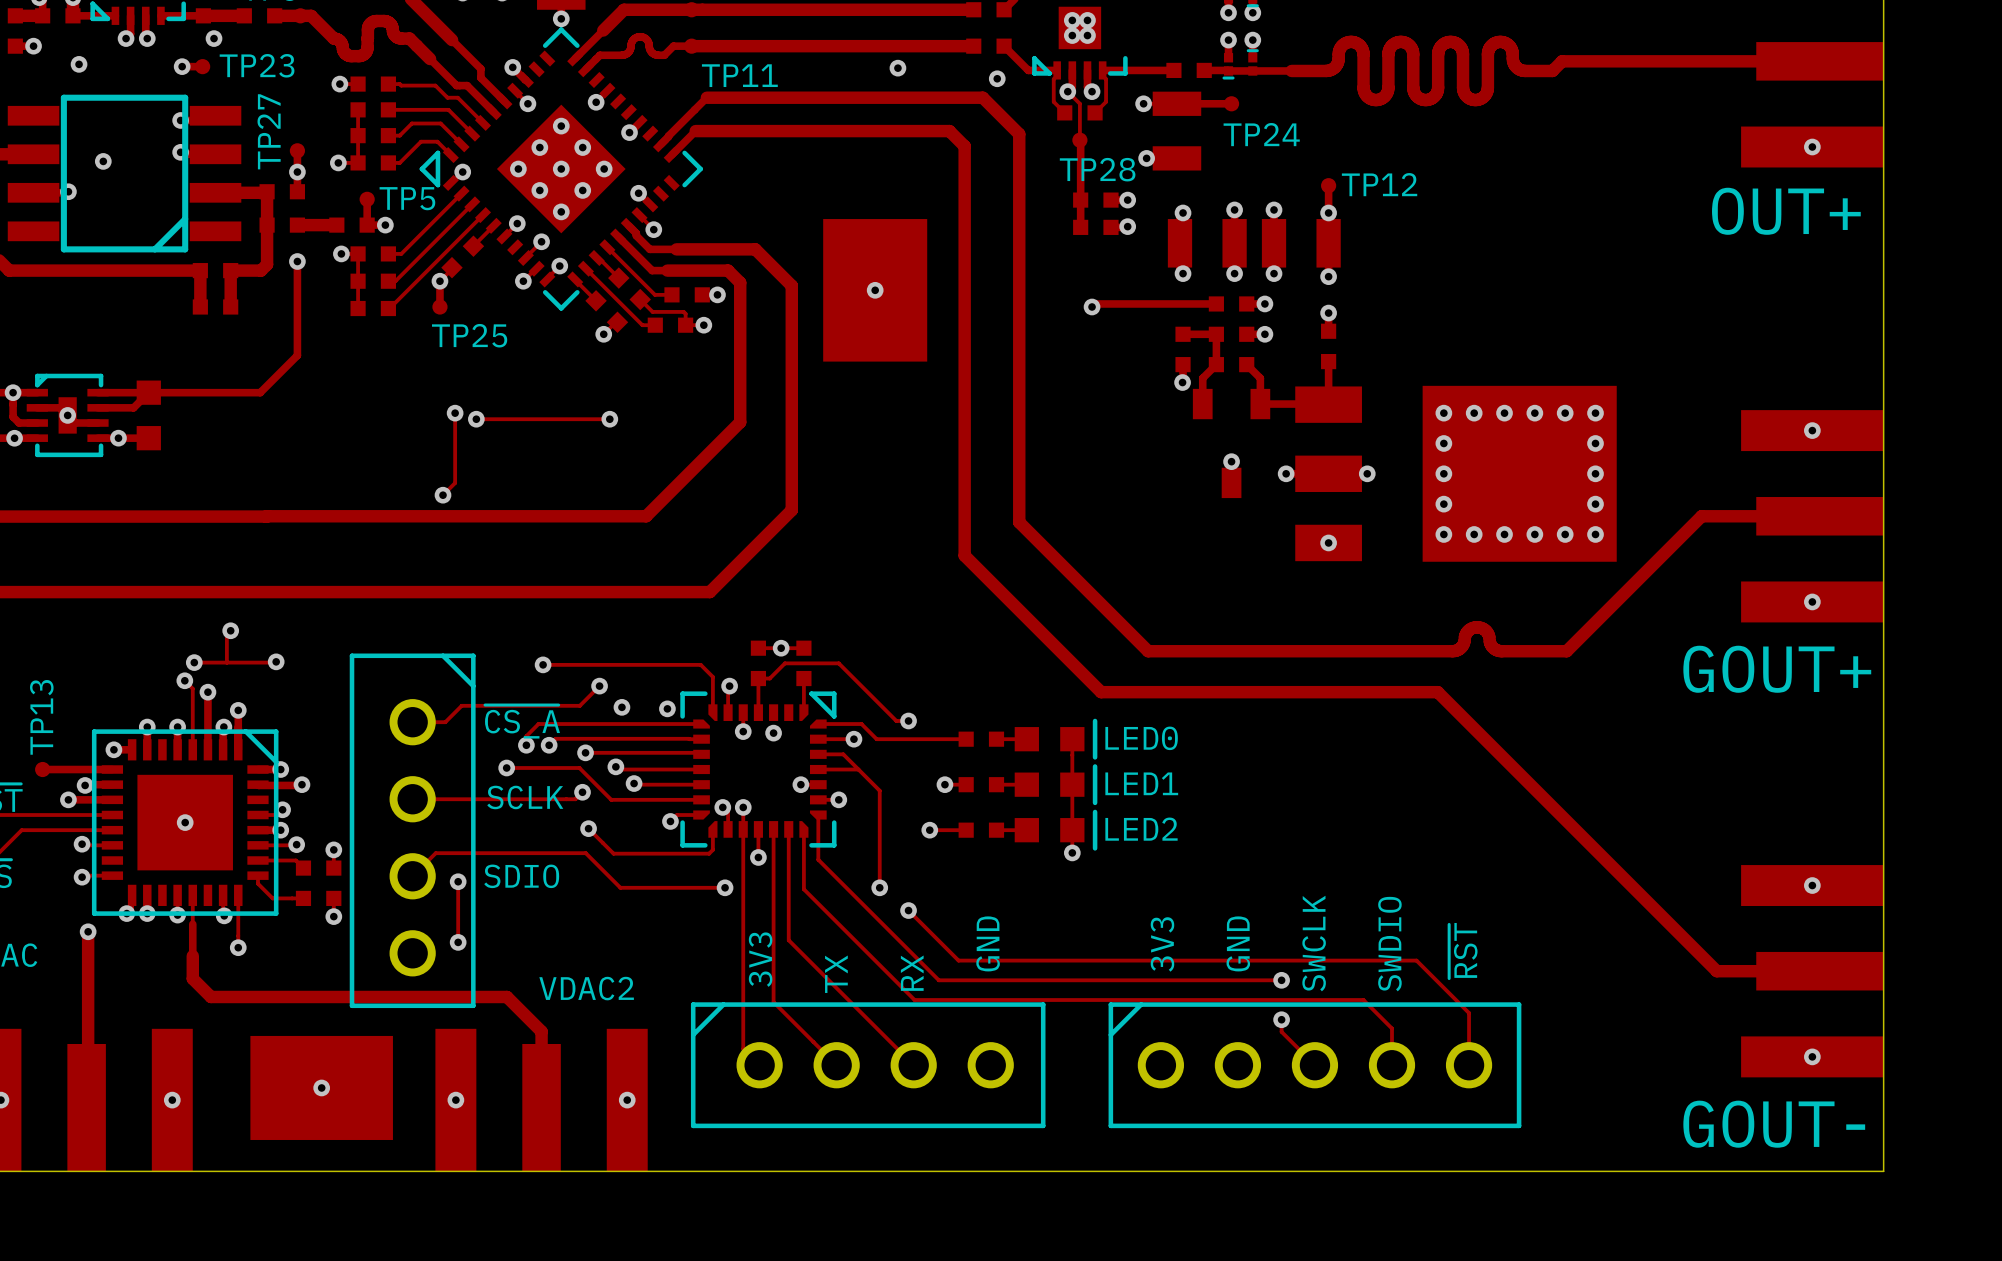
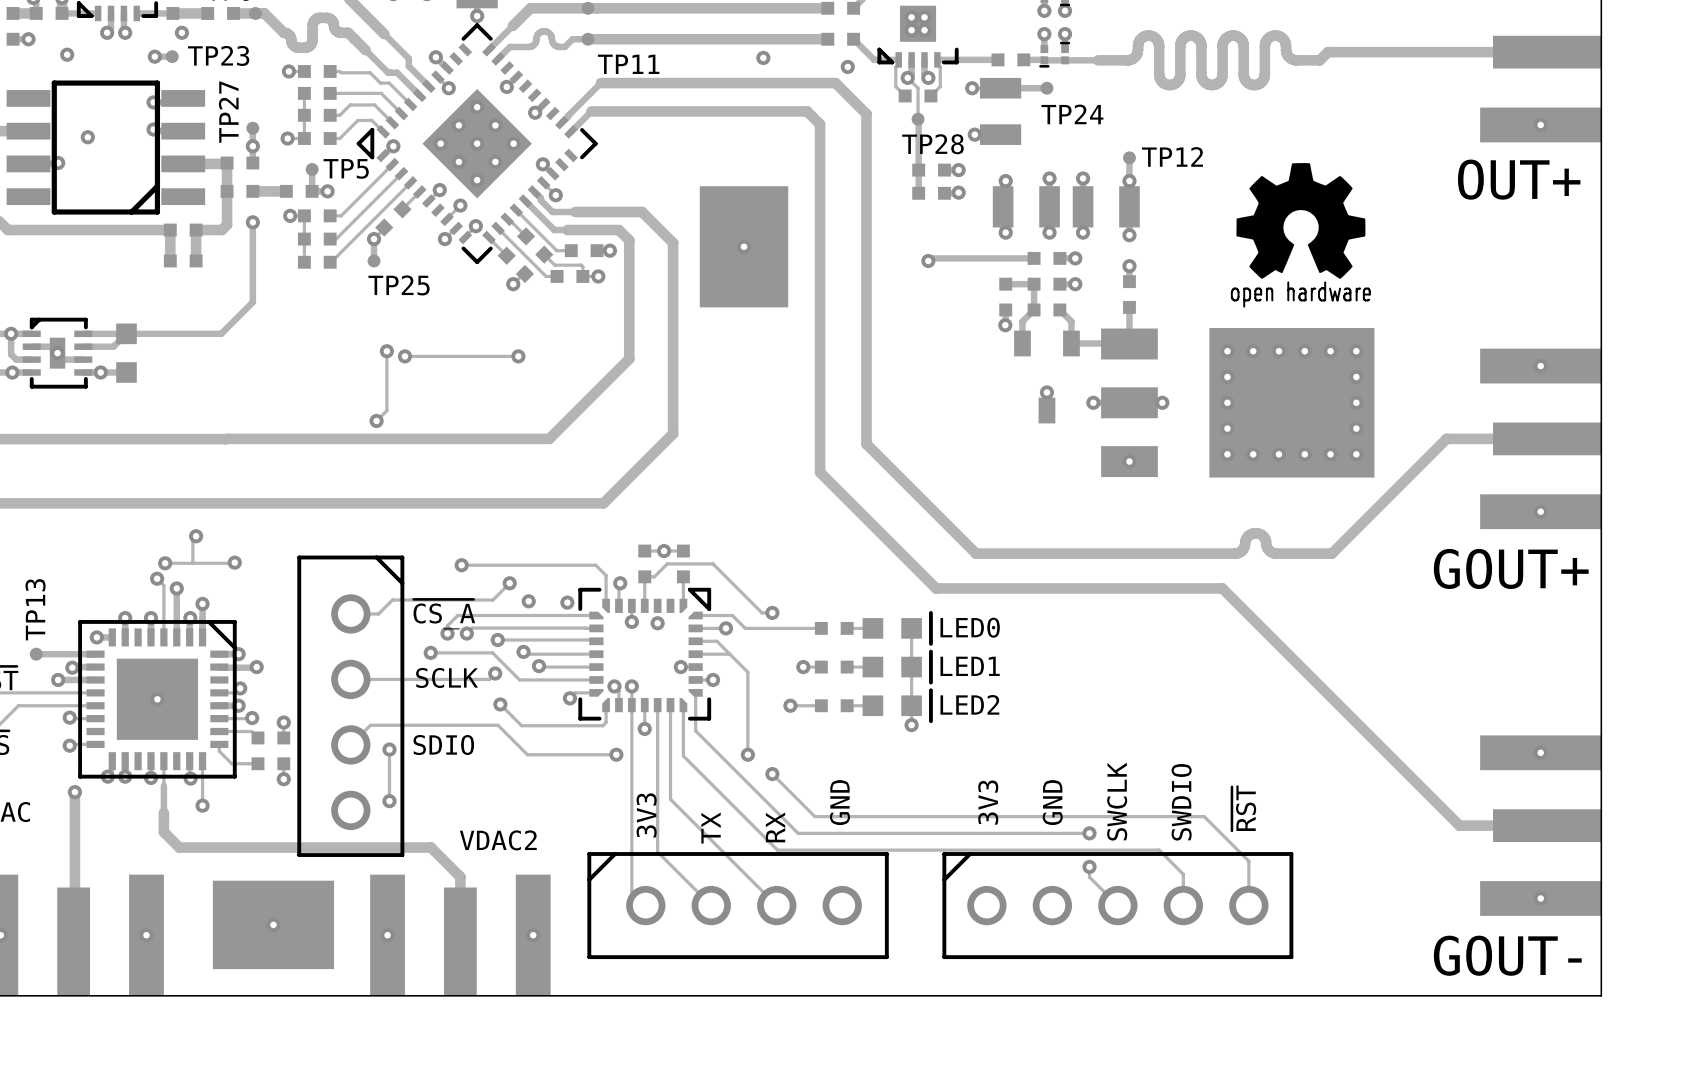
drawing: none -> [1230, 163, 1371, 308]

